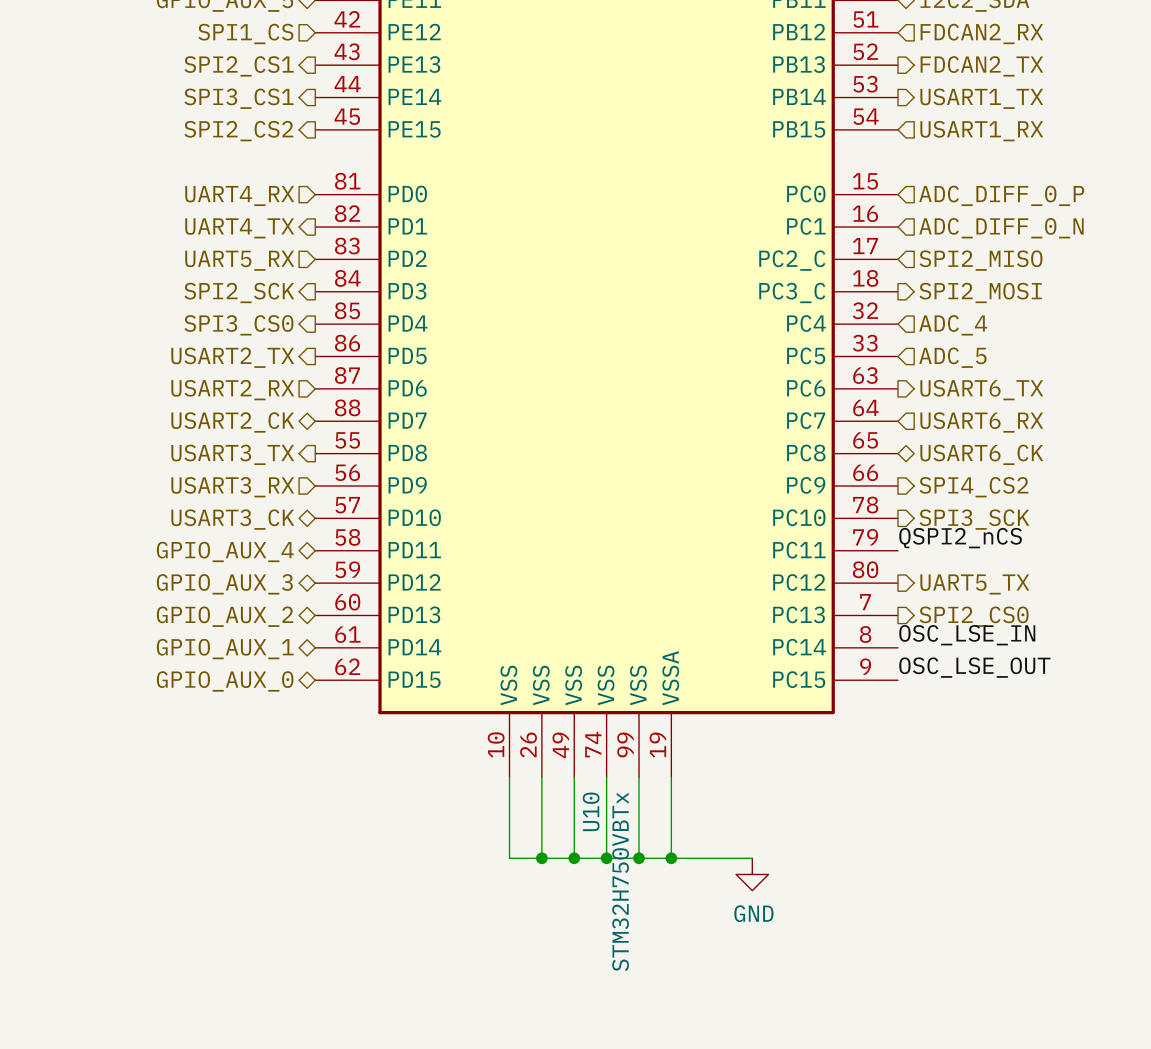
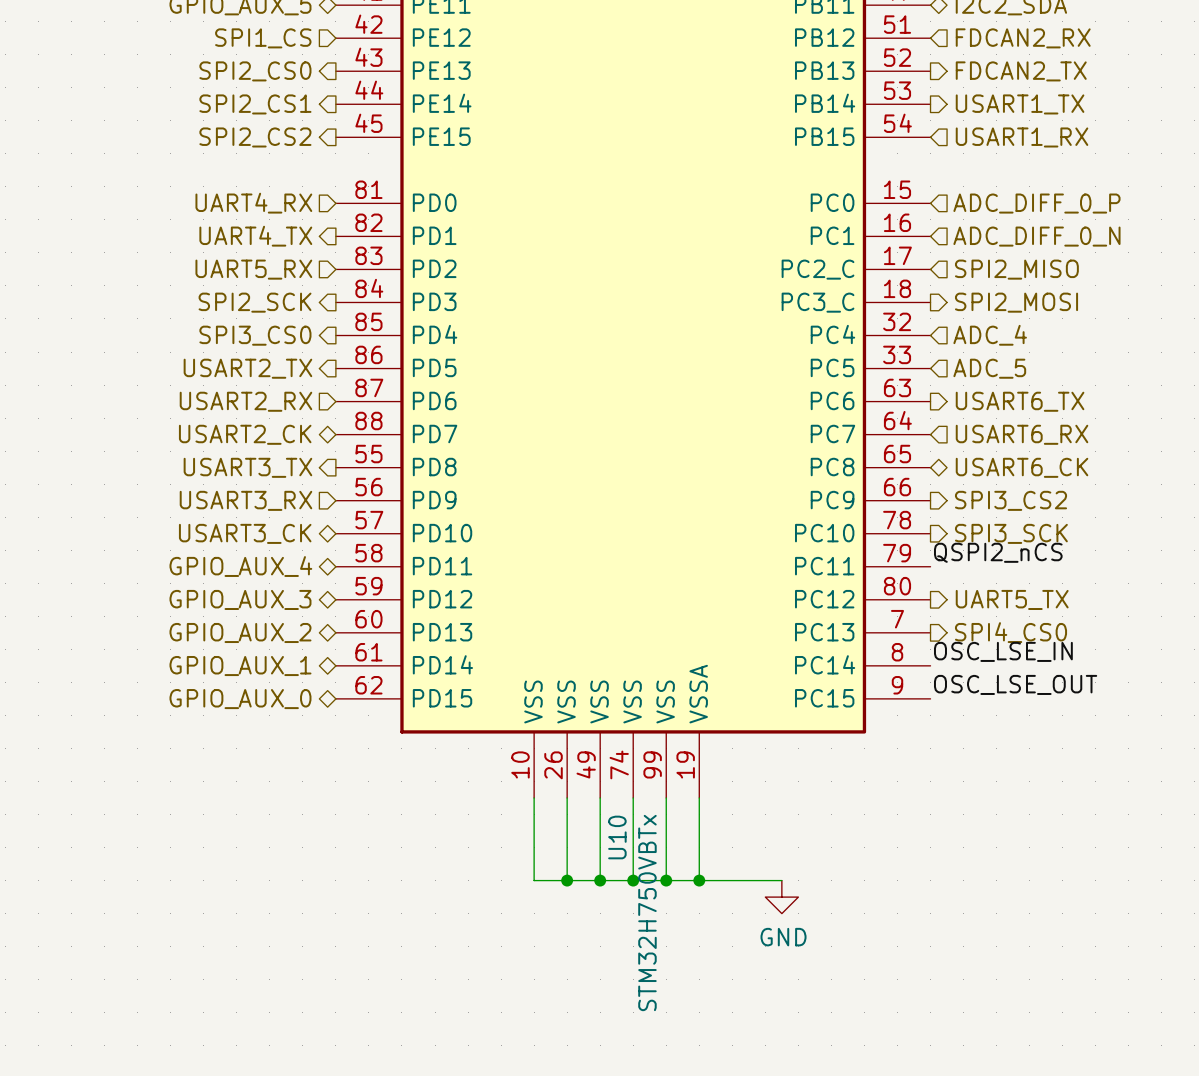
hierarchical label: SPI2_CS1 (239, 66) -> SPI2_CS0 (255, 71)
hierarchical label: SPI3_CS1 (239, 98) -> SPI2_CS1 (255, 104)
hierarchical label: SPI4_CS2 (973, 487) -> SPI3_CS2 (1011, 500)
hierarchical label: SPI2_CS0 (974, 616) -> SPI4_CS0 (1011, 632)

